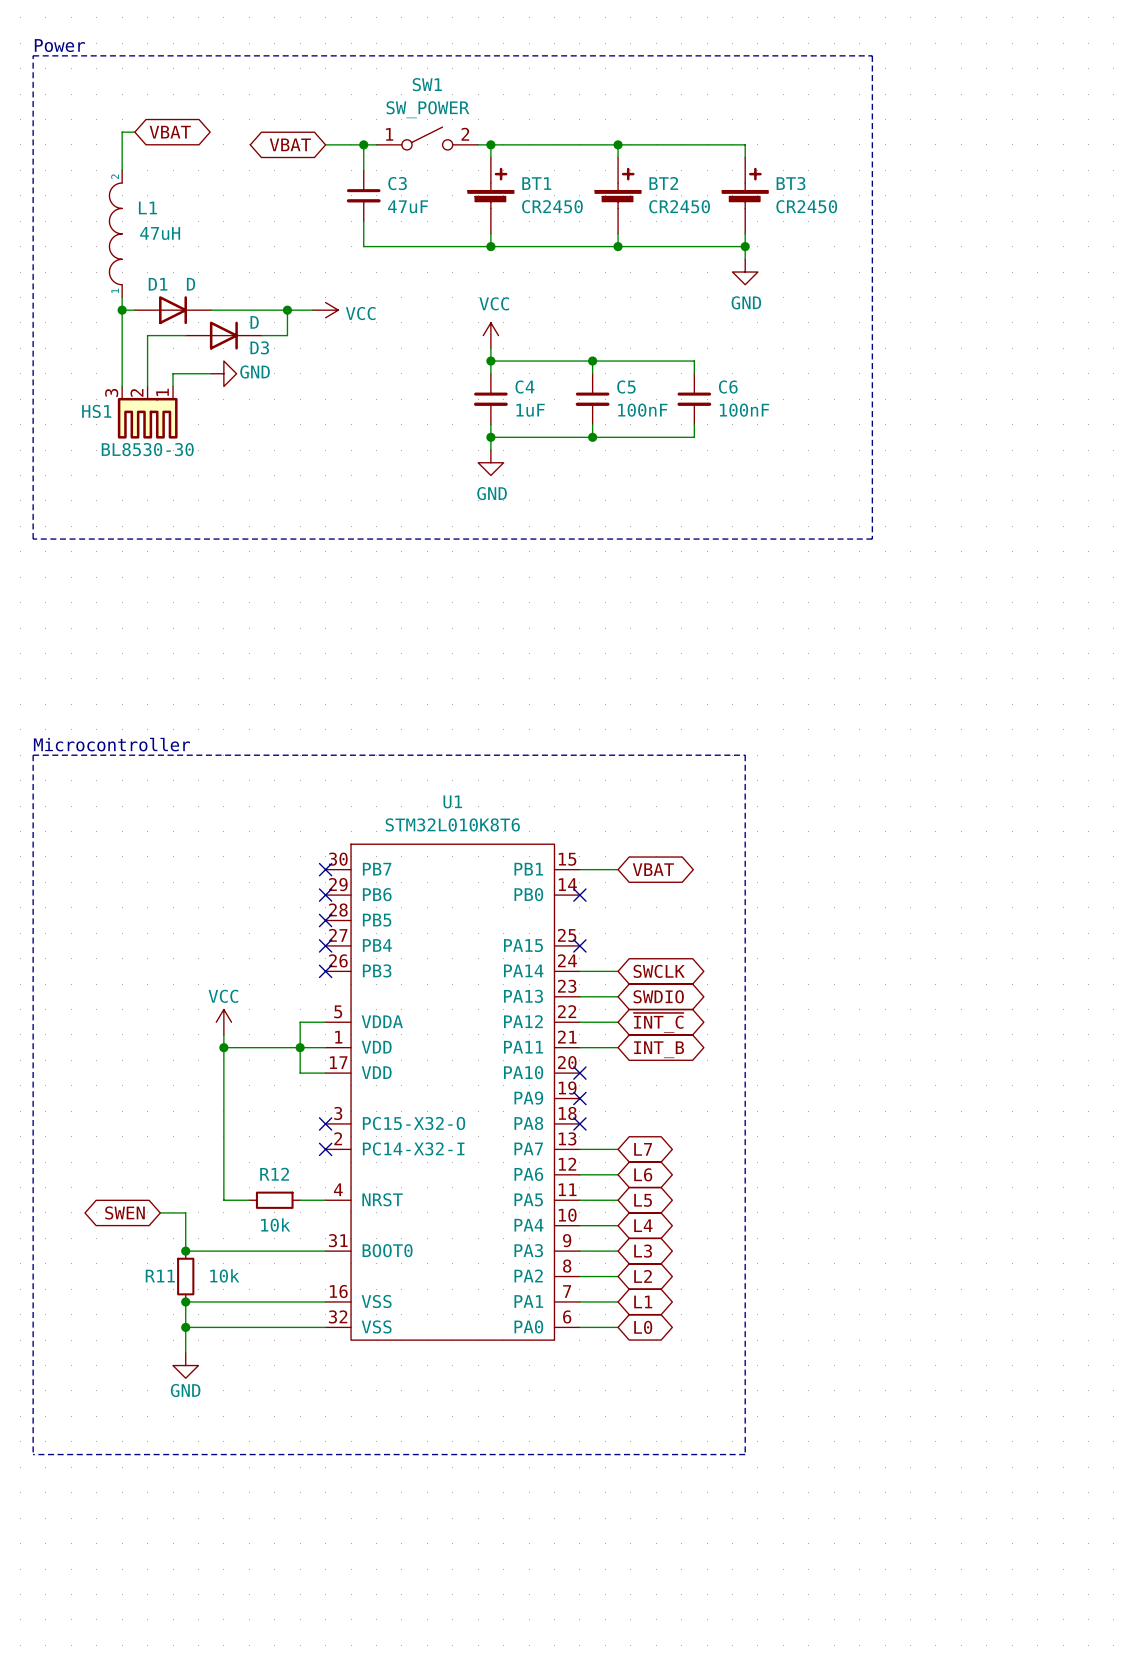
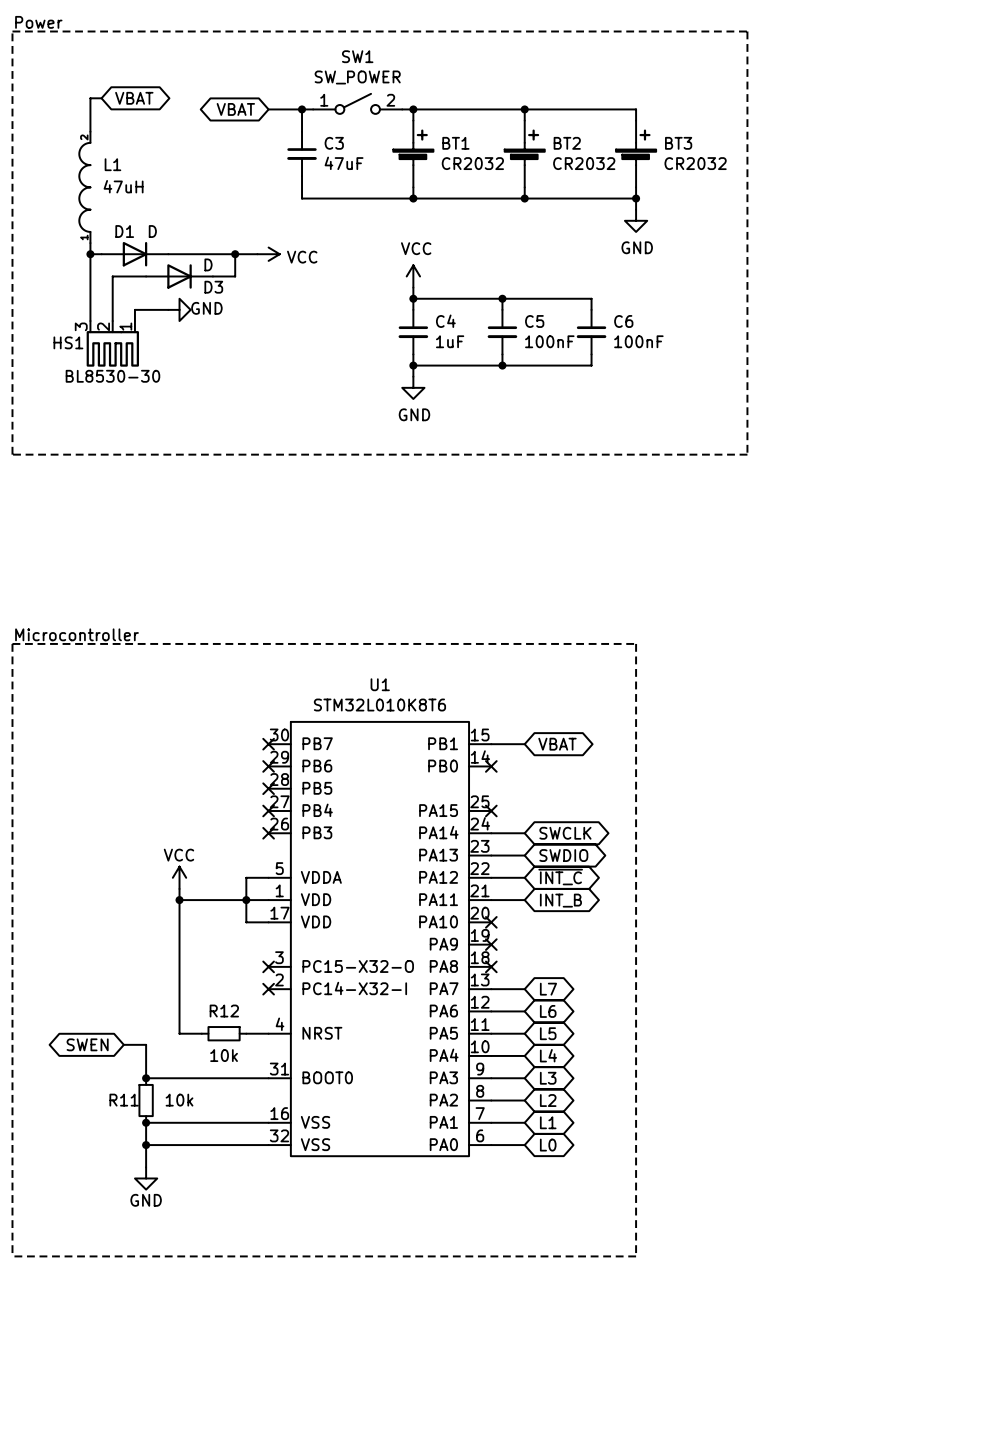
BT1 value: CR2450 (552, 206) -> CR2032 (472, 163)
BT2 value: CR2450 (679, 206) -> CR2032 (584, 163)
BT3 value: CR2450 (806, 206) -> CR2032 (695, 163)

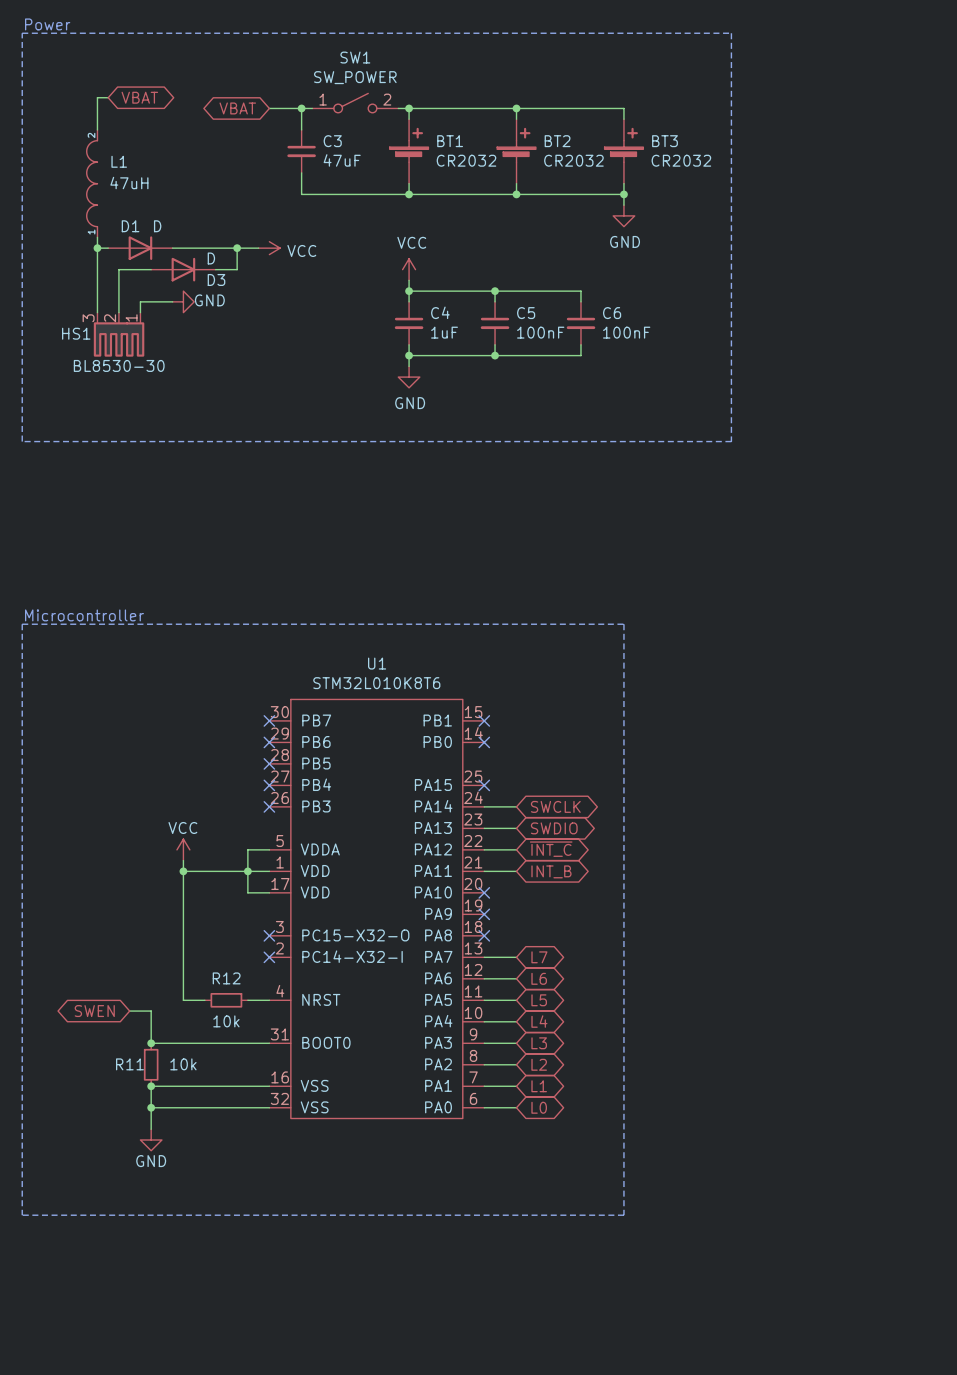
wire: (491, 744) (524, 744) -> none
no-connect mark: none -> (484, 720)
global label: VBAT (557, 744) -> none

